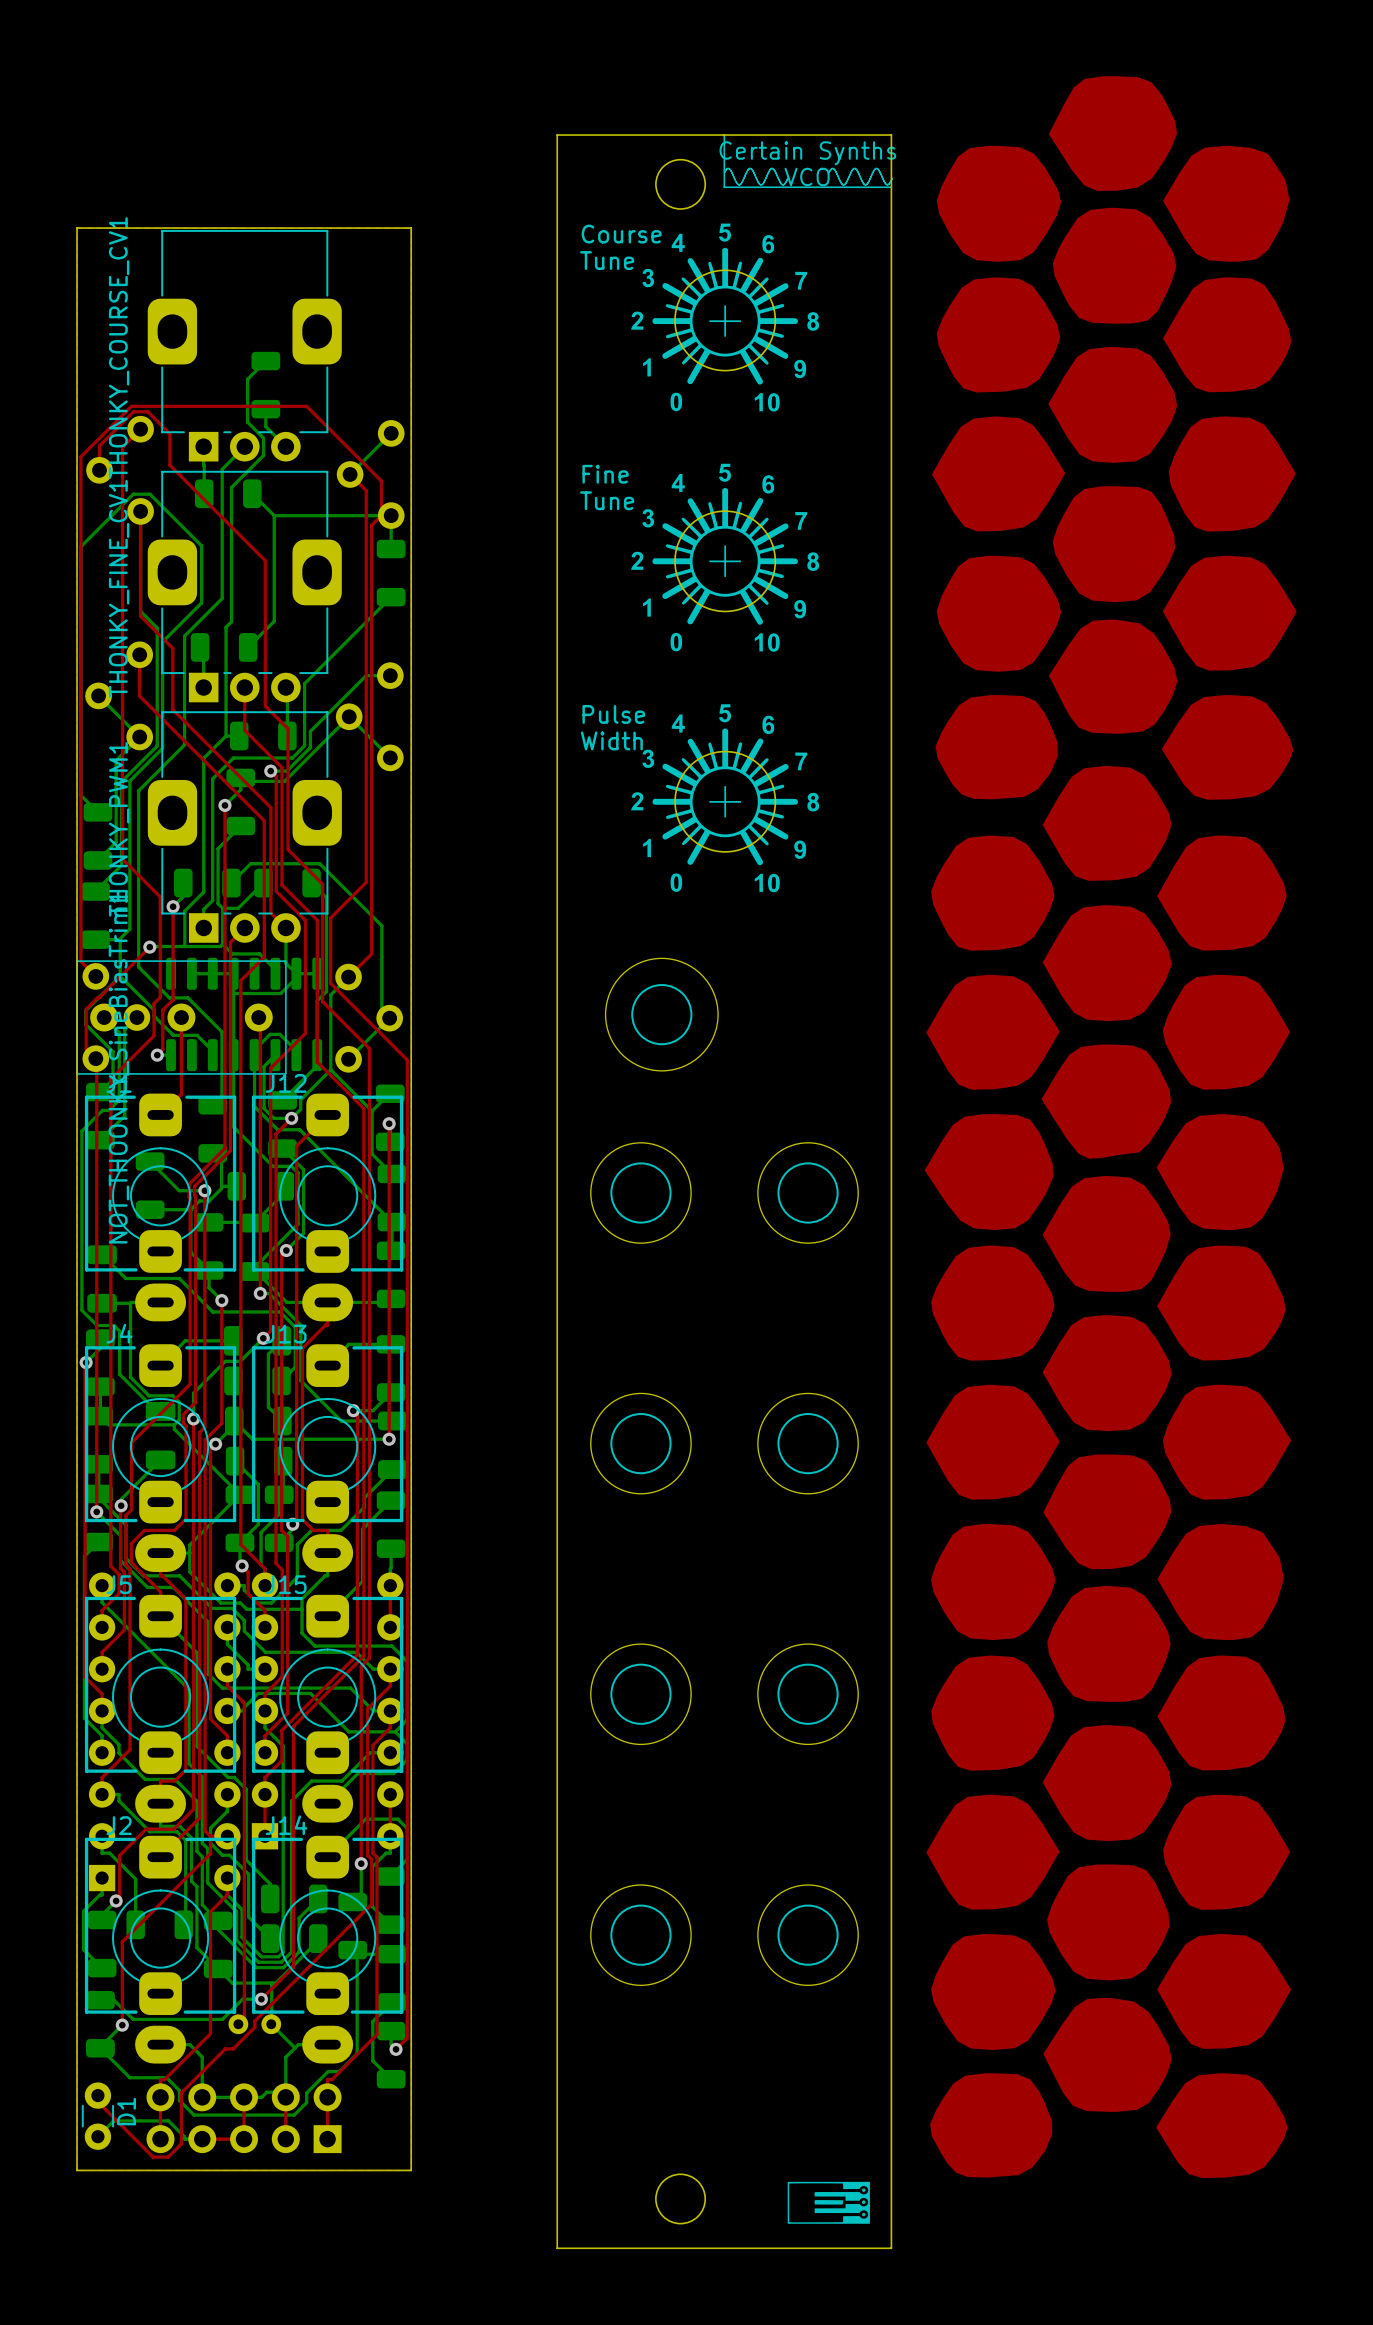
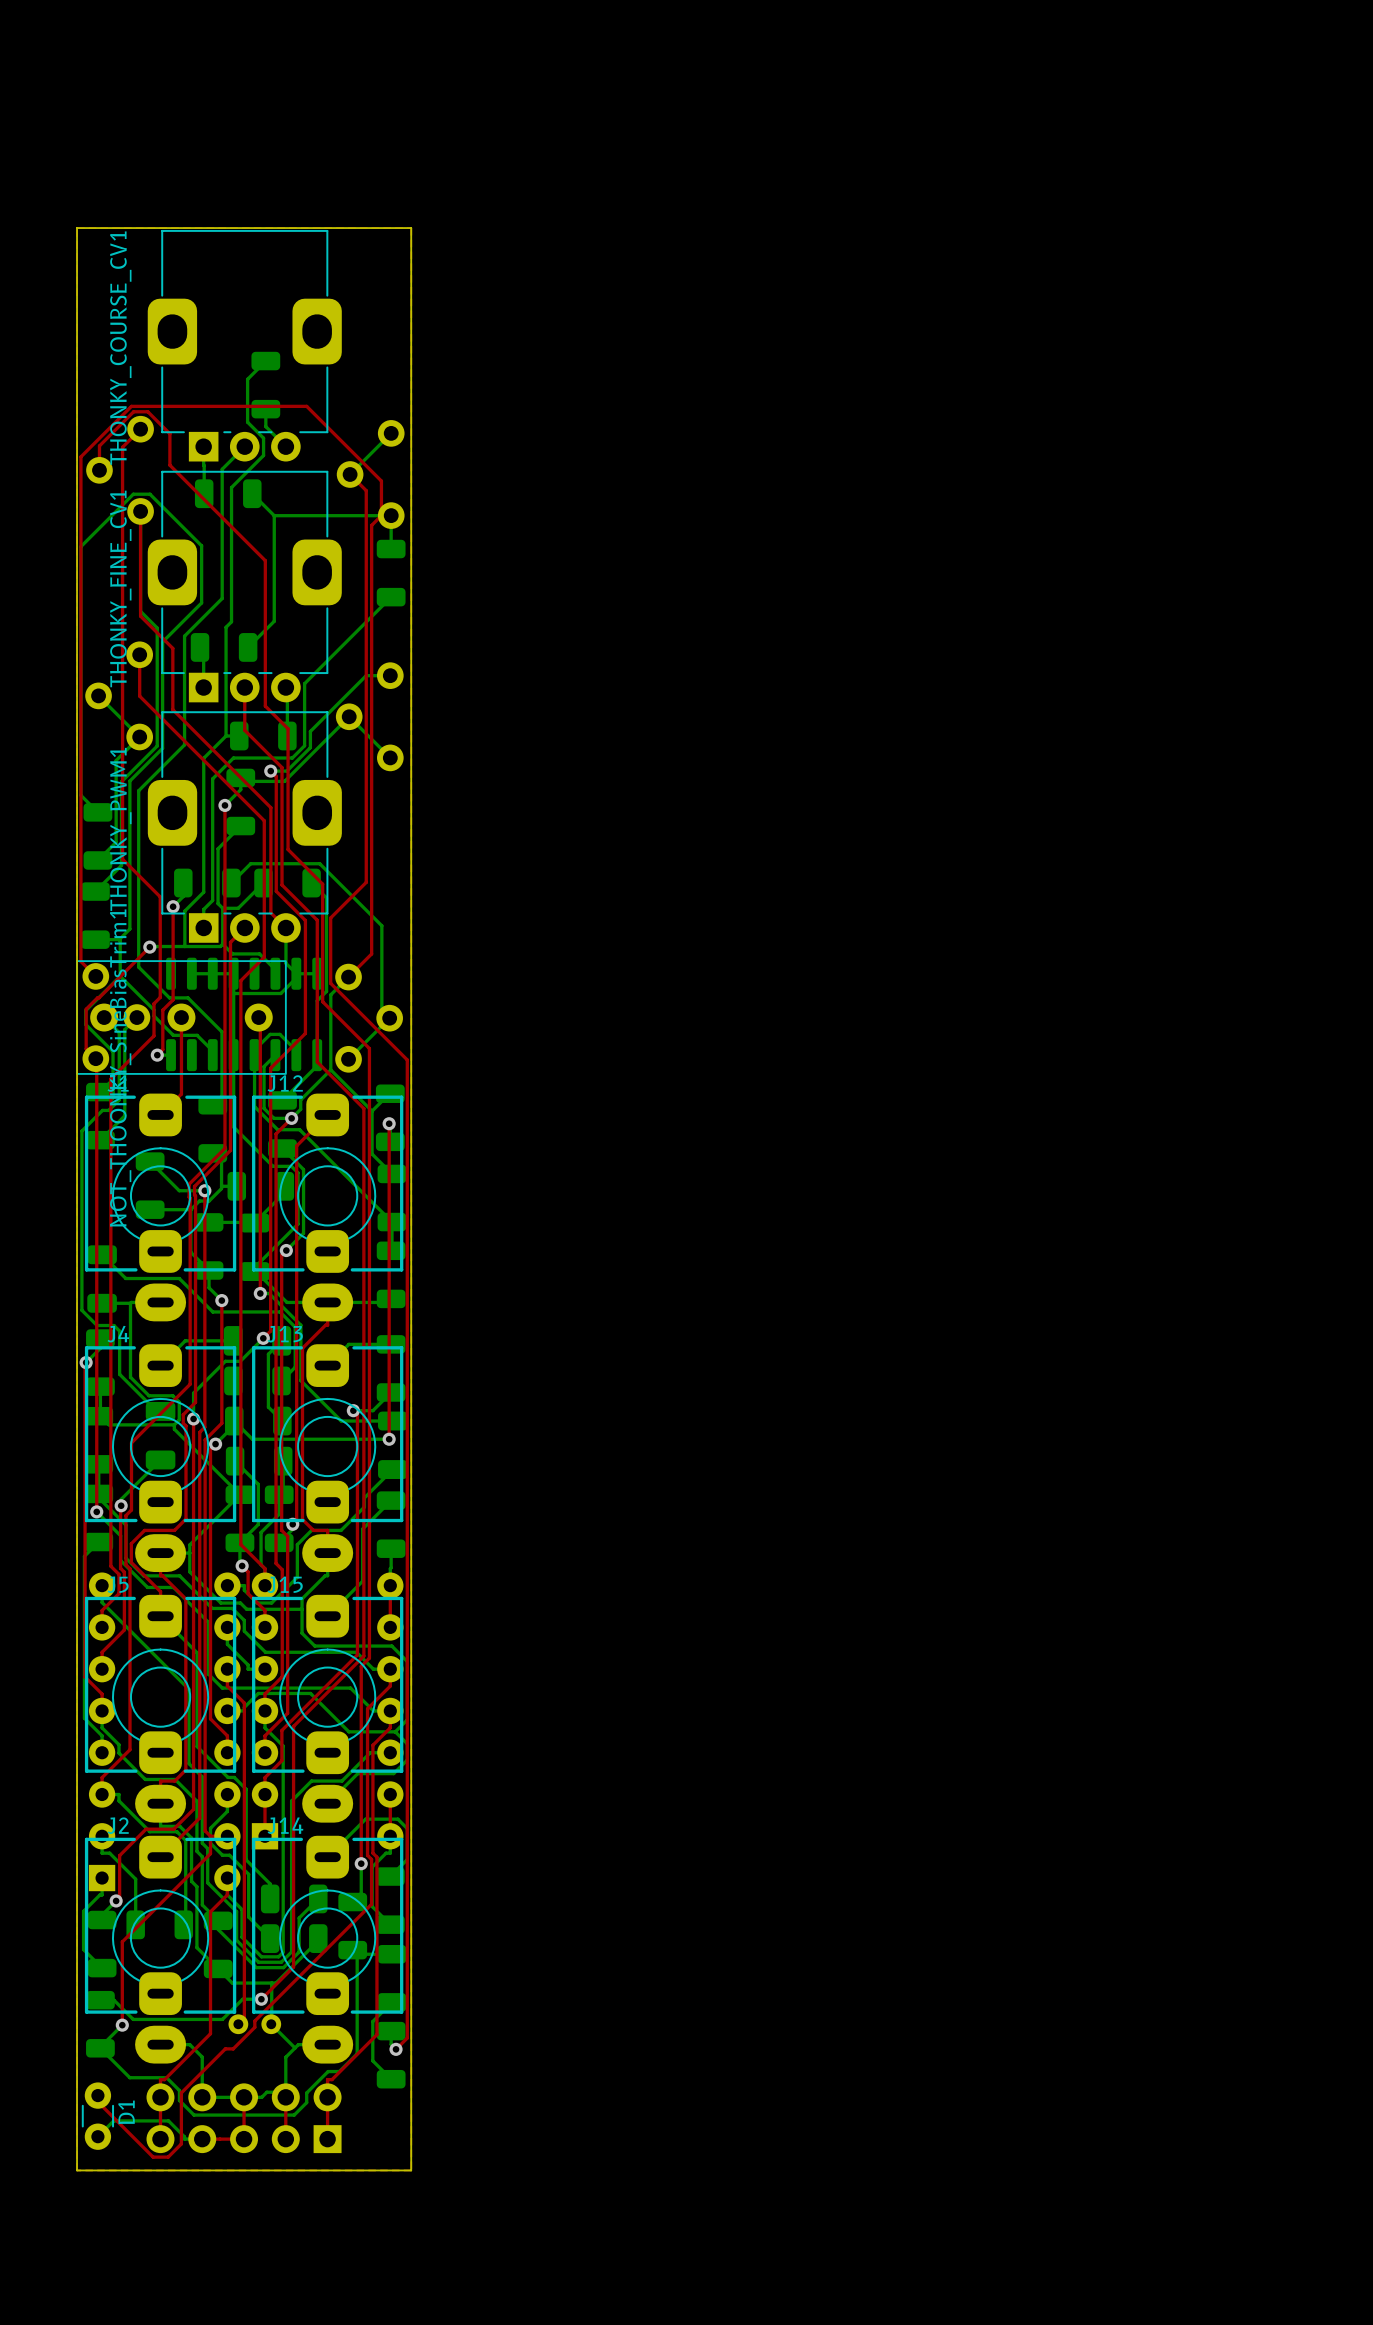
drawing: [924, 76, 1297, 2179] -> none
board edge: (557, 135) (891, 135) (891, 2248) (557, 2248) (557, 135) -> none
line: (724, 135) (724, 187) (891, 187) -> none
text: Certain Synths (807, 153) -> none
round board edge: [655, 158, 707, 210] -> none
drawing: [723, 167, 789, 186] -> none
drawing: [828, 167, 894, 186] -> none
text: VCO (807, 177) -> none
drawing: [631, 223, 820, 412] -> none
text: Course (621, 234) -> none
text: Tune (607, 260) -> none
drawing: [631, 463, 820, 652] -> none
text: Fine (605, 474) -> none
text: Tune (607, 500) -> none
drawing: [631, 704, 820, 893] -> none
text: Pulse (613, 714) -> none
text: Width (611, 740) -> none
drawing: [605, 957, 719, 1072] -> none
drawing: [590, 1142, 692, 1244] -> none
drawing: [757, 1142, 859, 1244] -> none
drawing: [590, 1393, 692, 1495] -> none
drawing: [757, 1393, 859, 1495] -> none
drawing: [590, 1643, 692, 1745] -> none
drawing: [757, 1643, 859, 1745] -> none
drawing: [590, 1884, 692, 1986] -> none
drawing: [757, 1884, 859, 1986] -> none
round board edge: [655, 2173, 707, 2225] -> none
drawing: [787, 2181, 870, 2224] -> none

